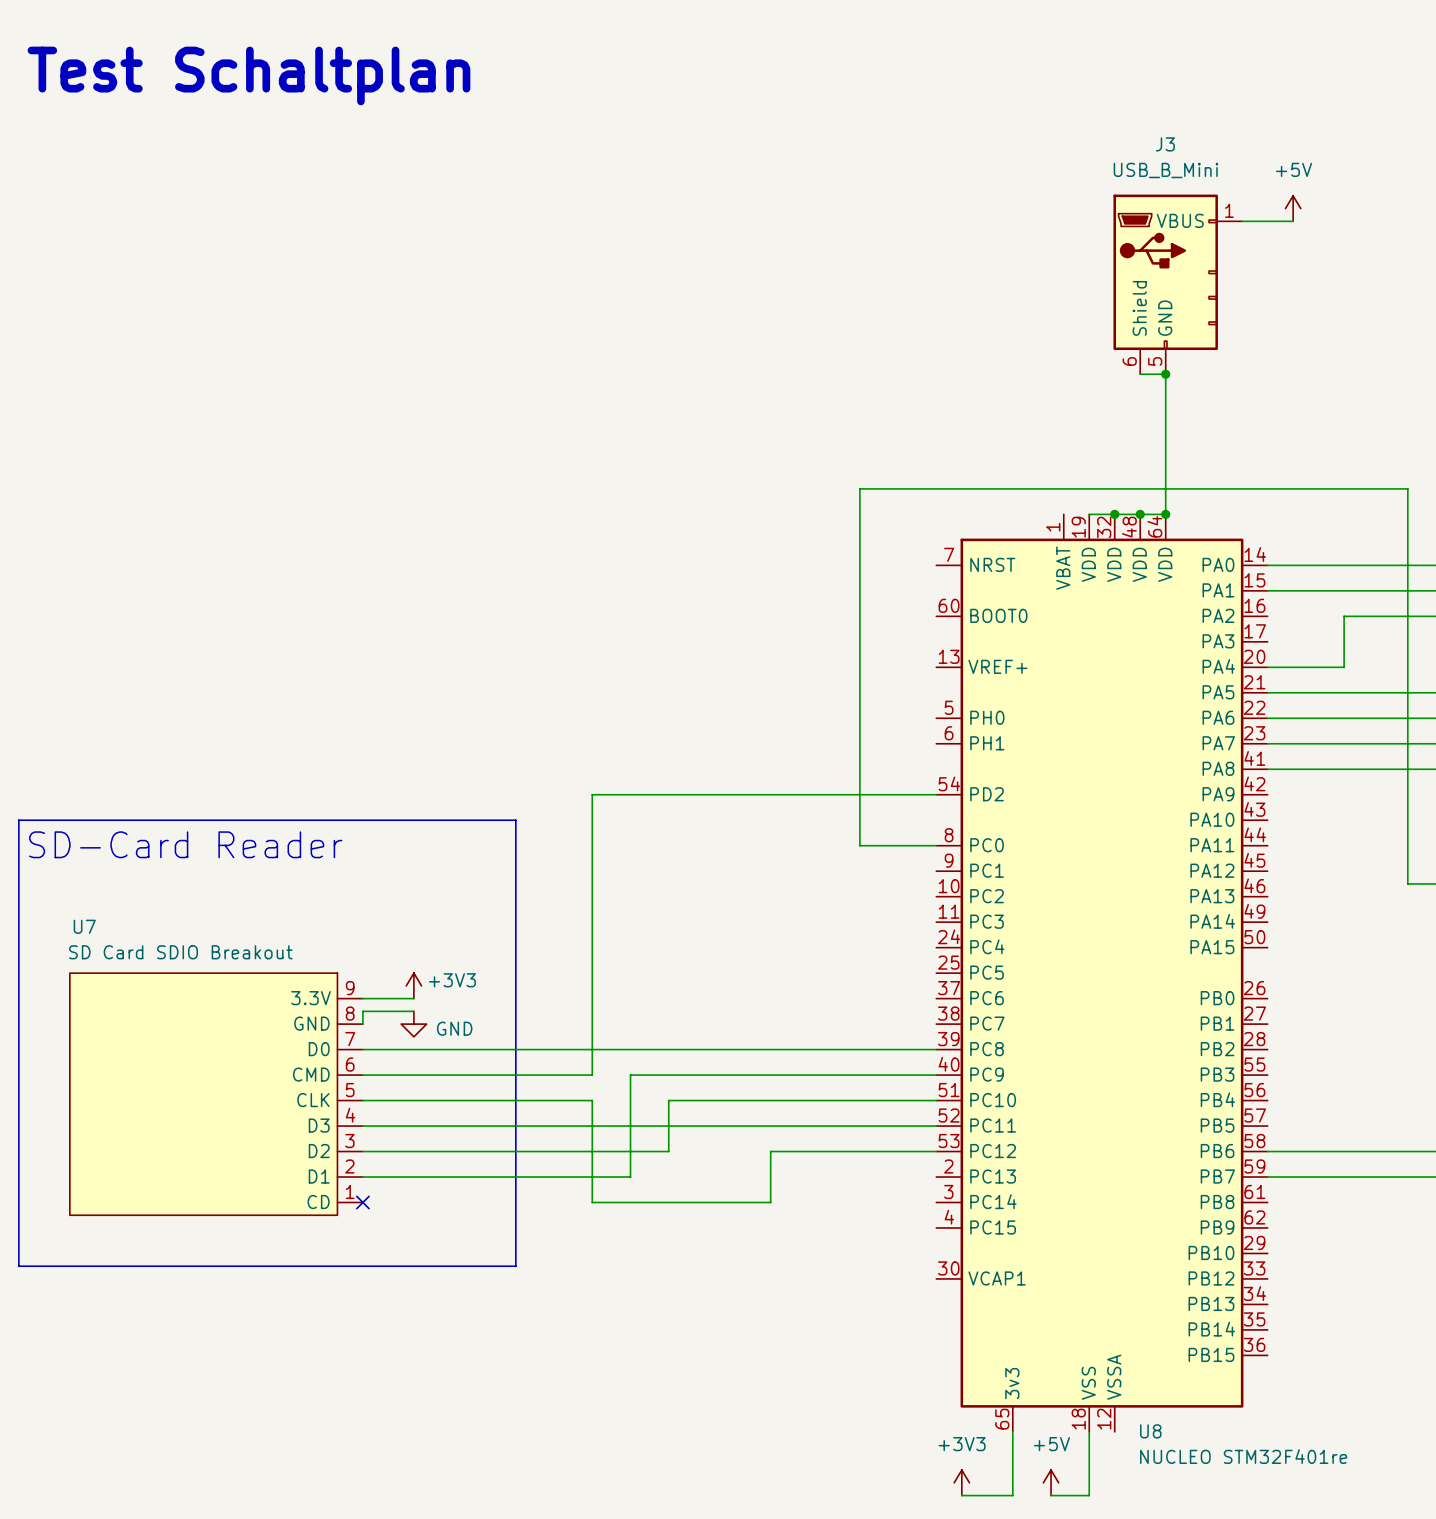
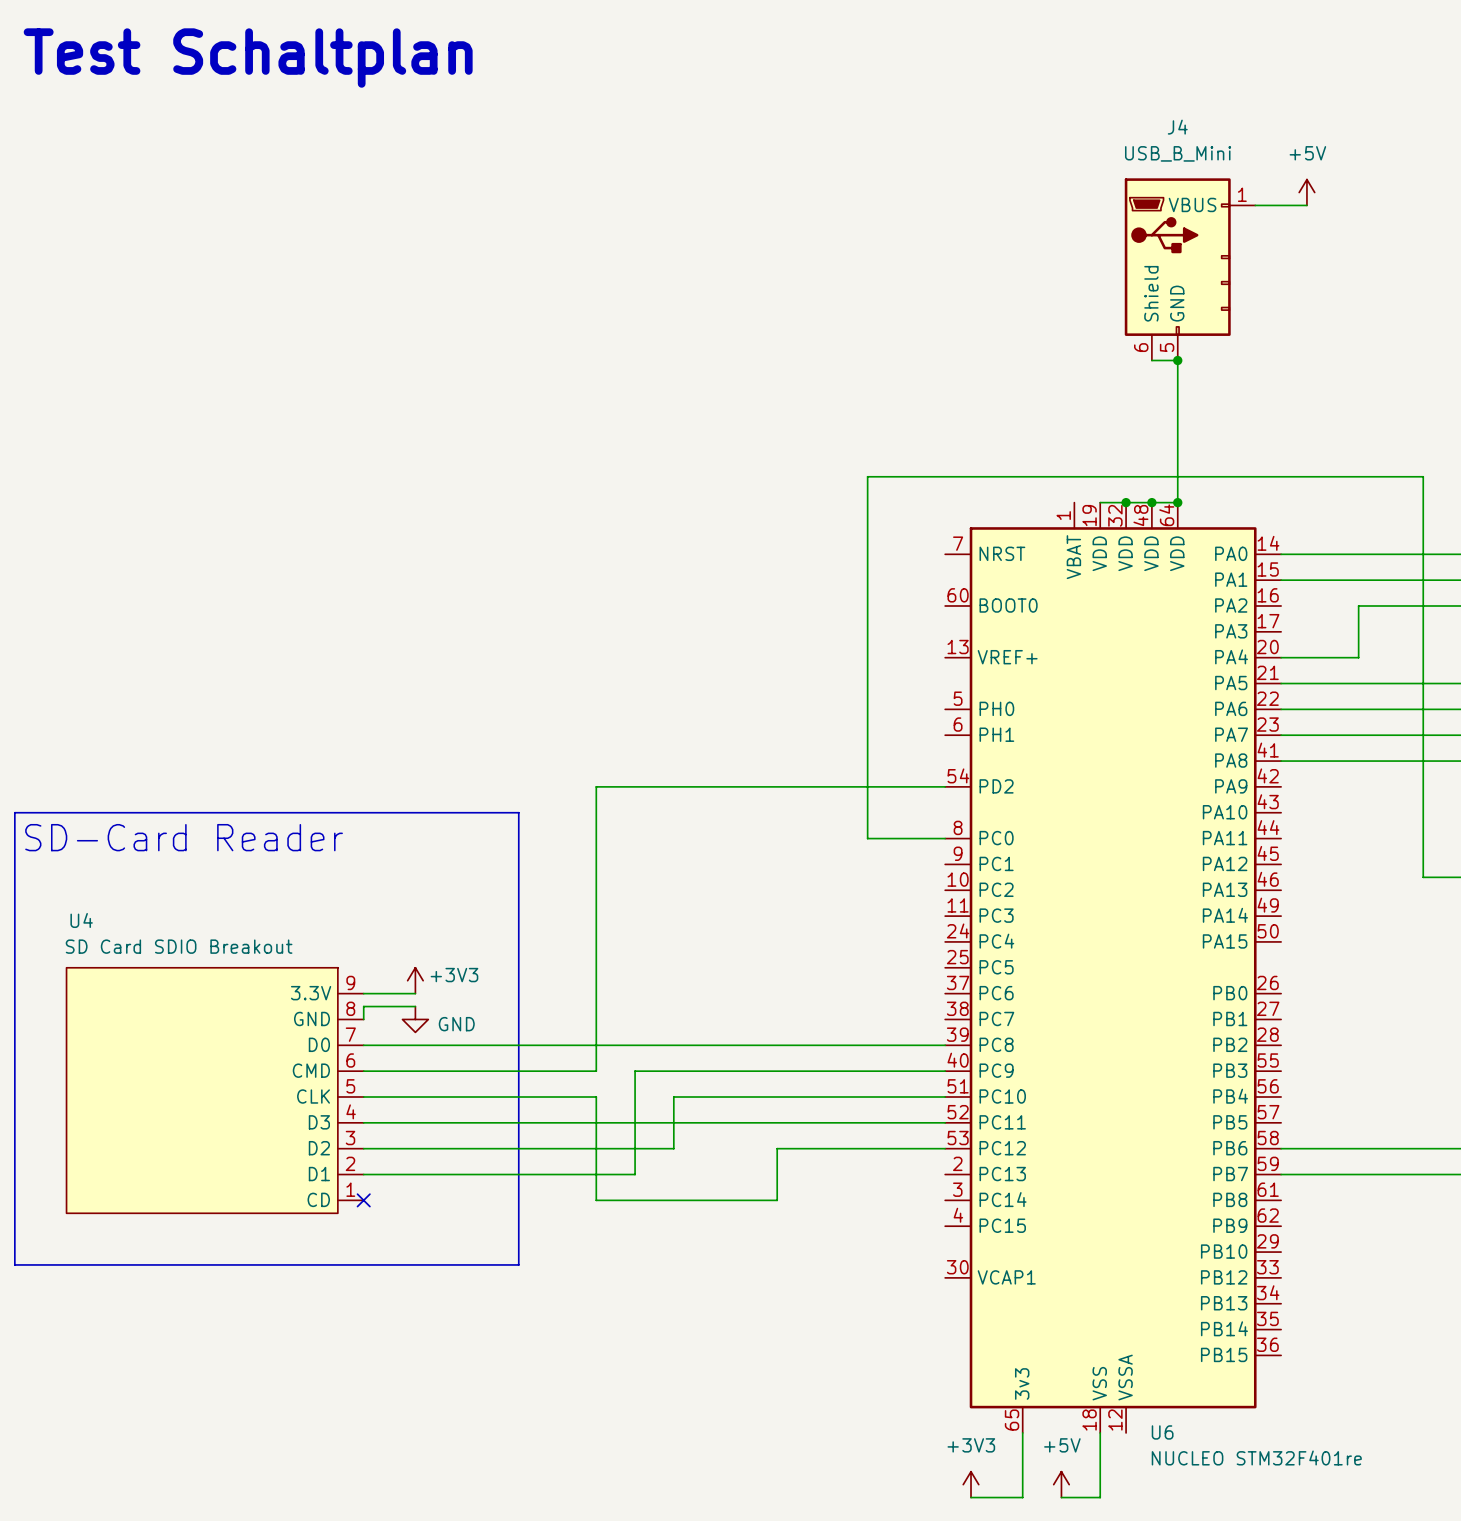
J3 name: J3 (1165, 144) -> J4 (1177, 127)
U7 name: U7 (84, 926) -> U4 (81, 920)
U8 name: U8 (1150, 1431) -> U6 (1162, 1432)

